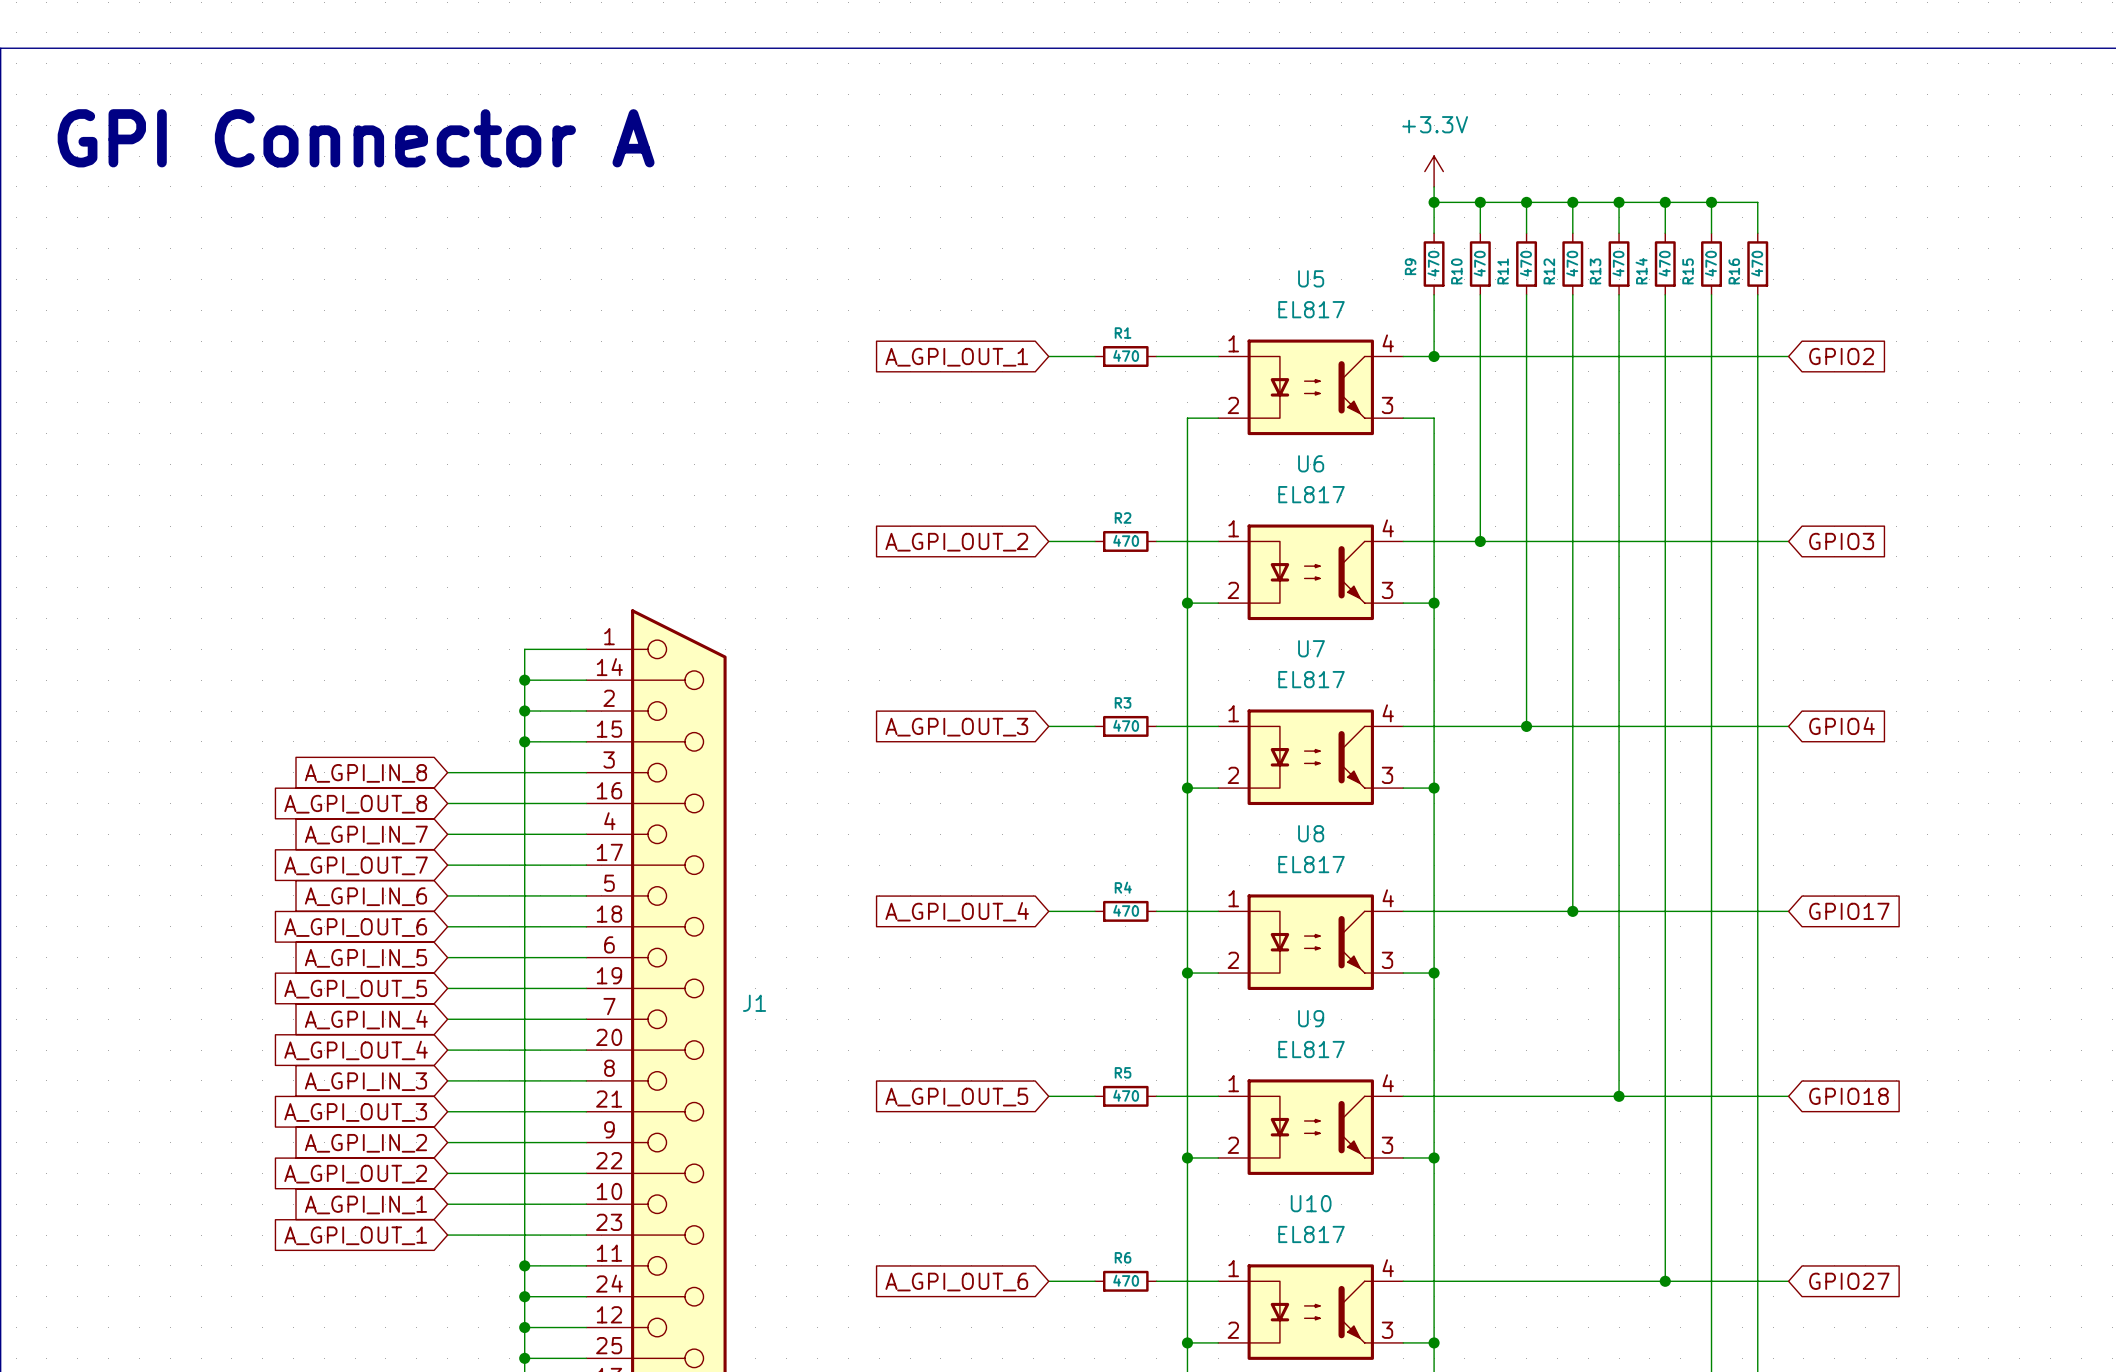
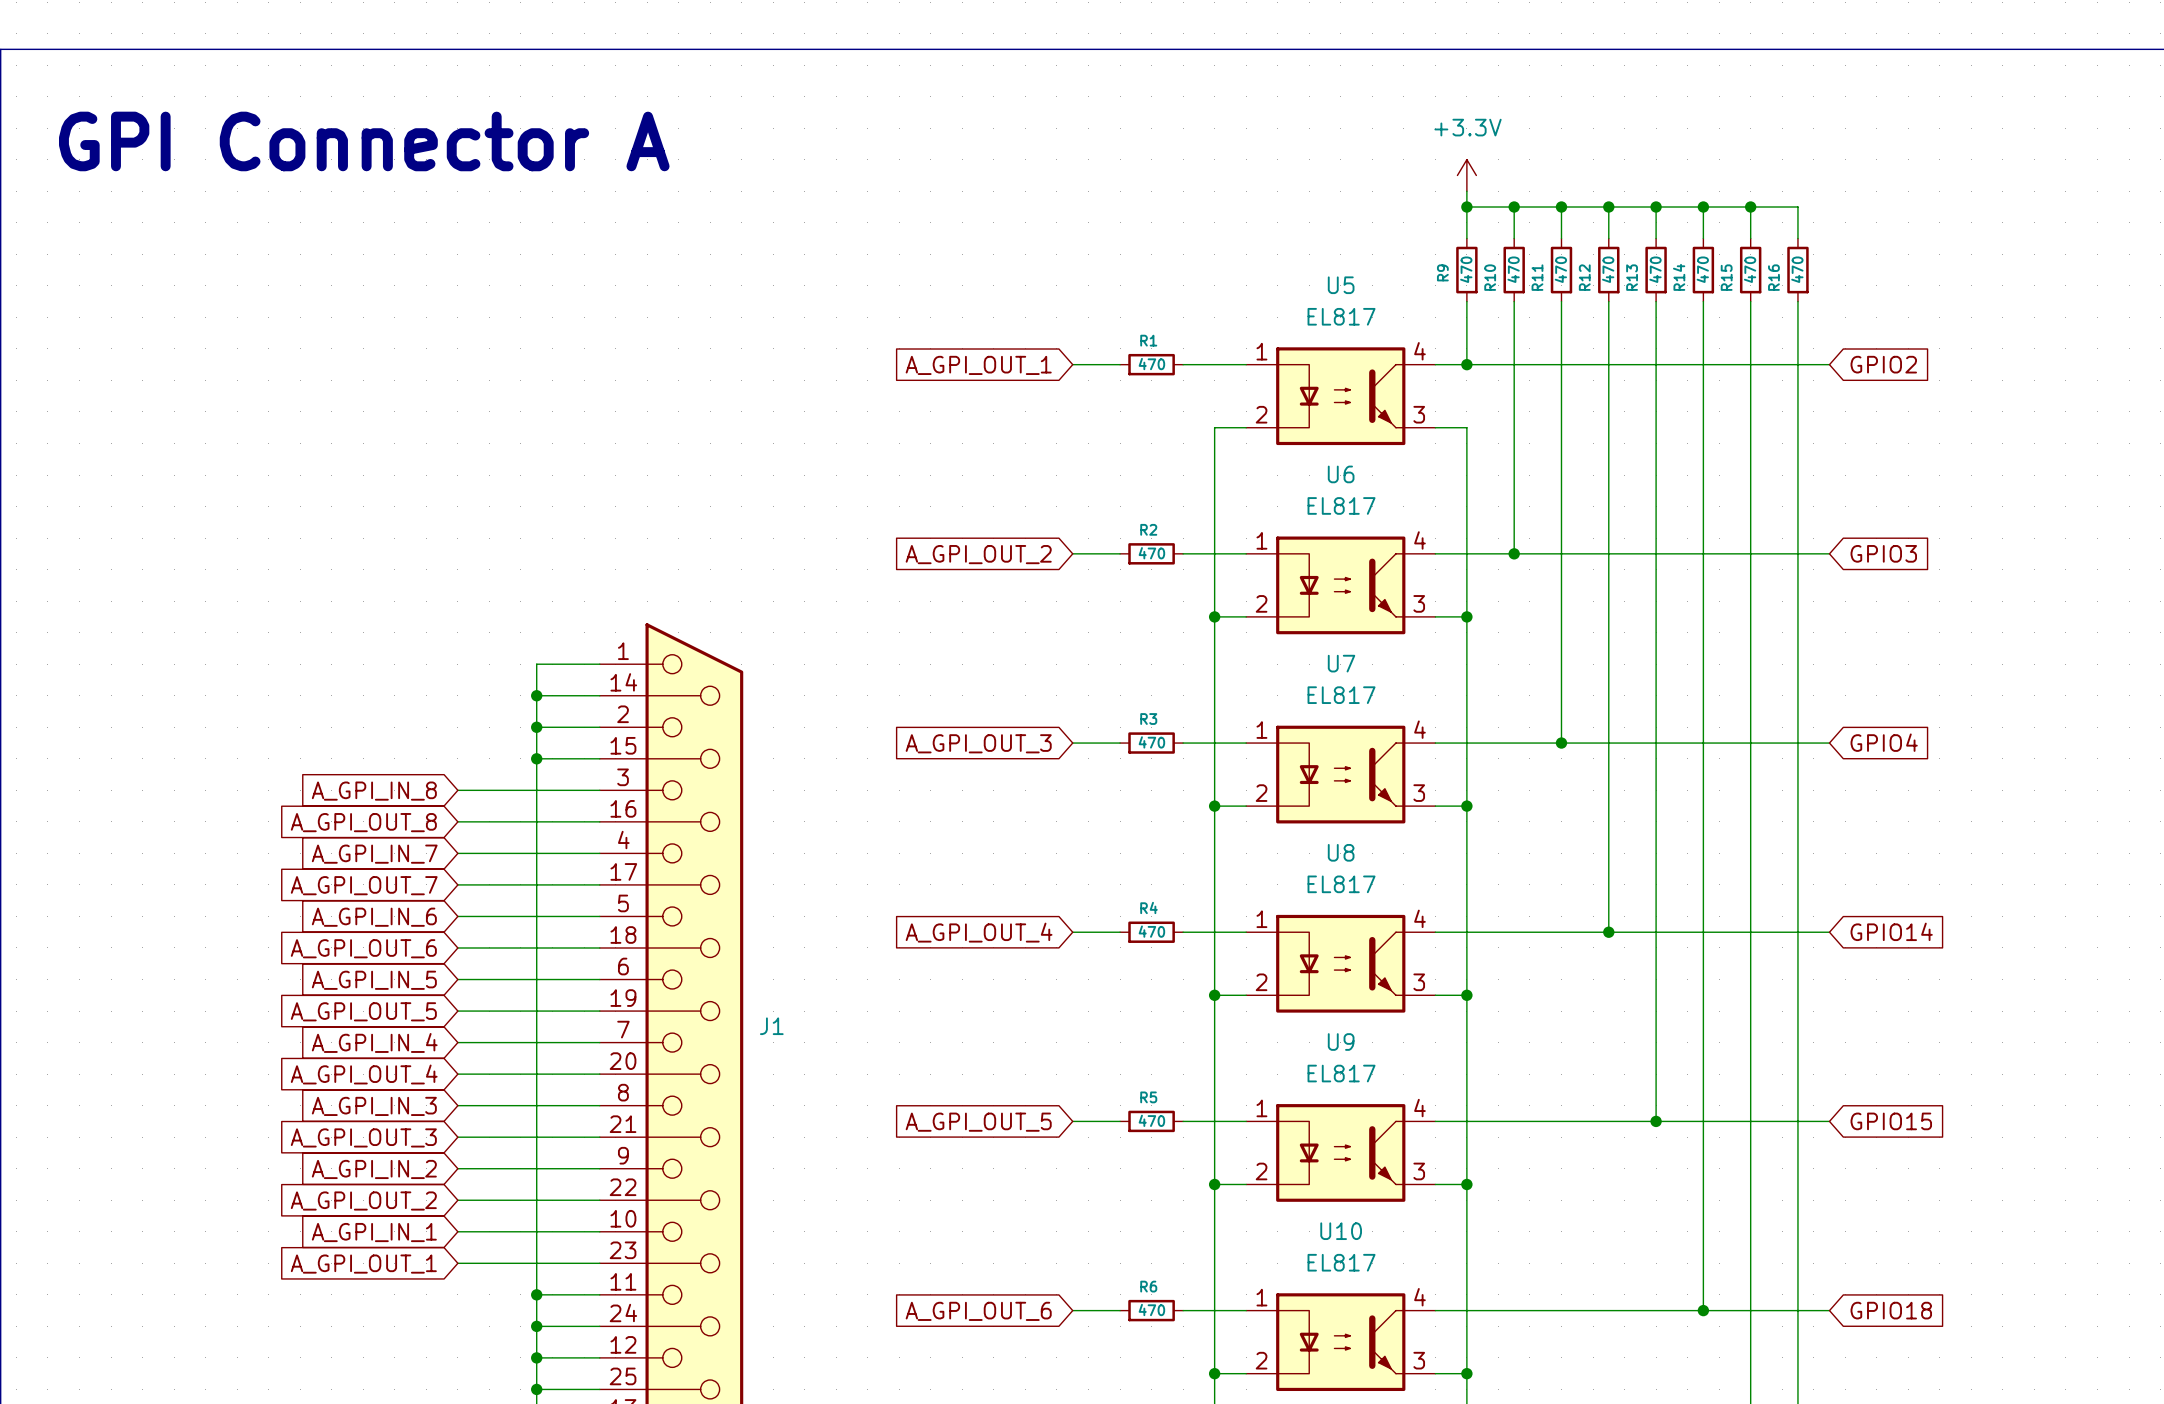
global label: GPIO17 (1849, 911) -> GPIO14 (1891, 931)
global label: GPIO18 (1848, 1096) -> GPIO15 (1891, 1121)
global label: GPIO27 (1849, 1281) -> GPIO18 (1891, 1310)

